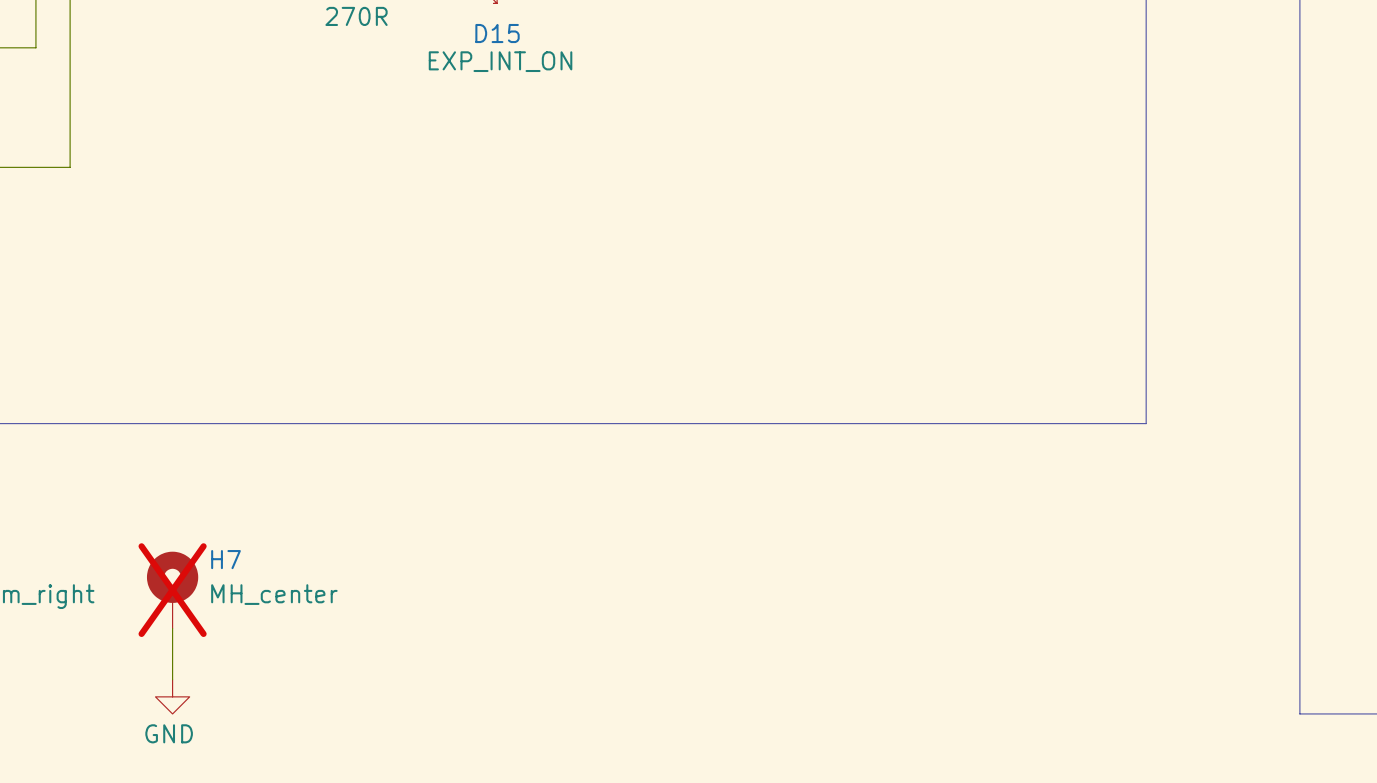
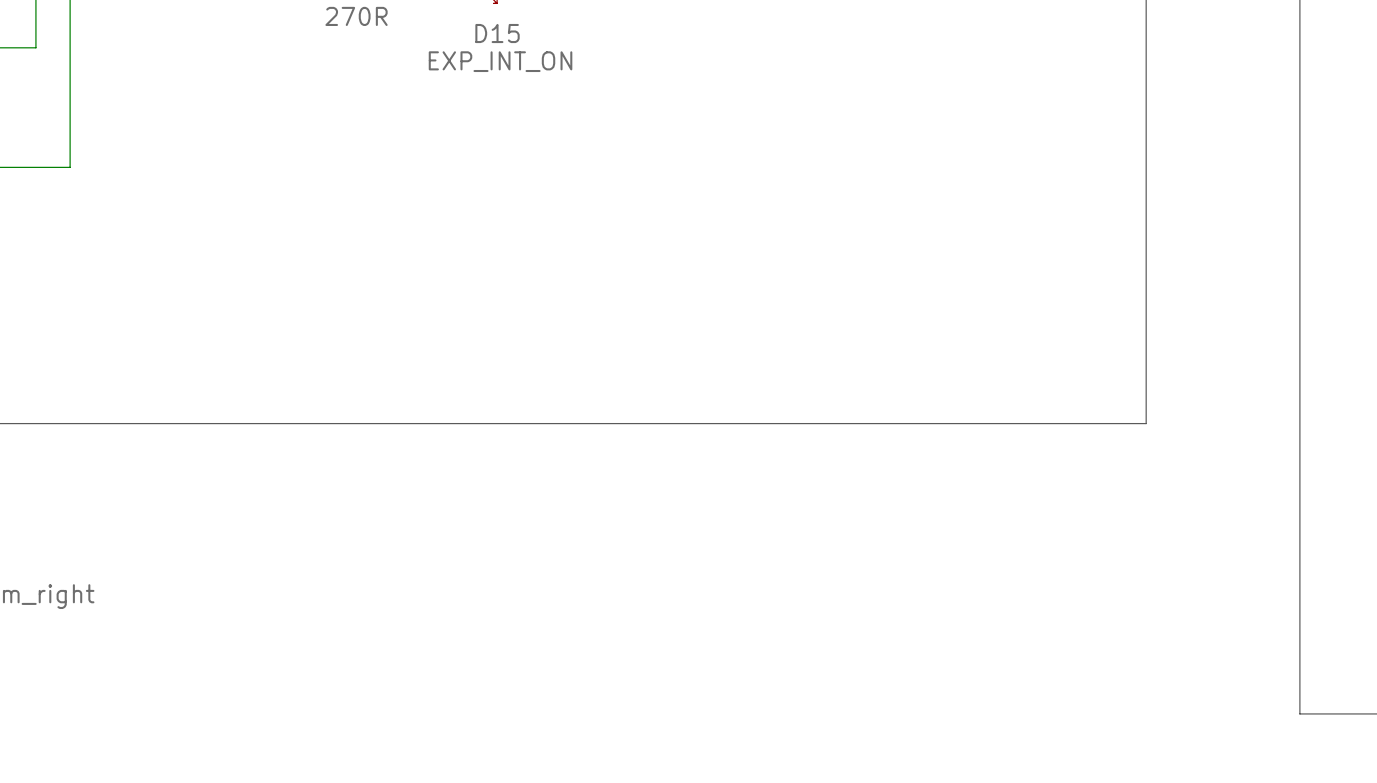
H7: MH_center (172, 590) -> none
wire: (172, 628) (172, 679) -> none
power symbol: GND (172, 696) -> none

